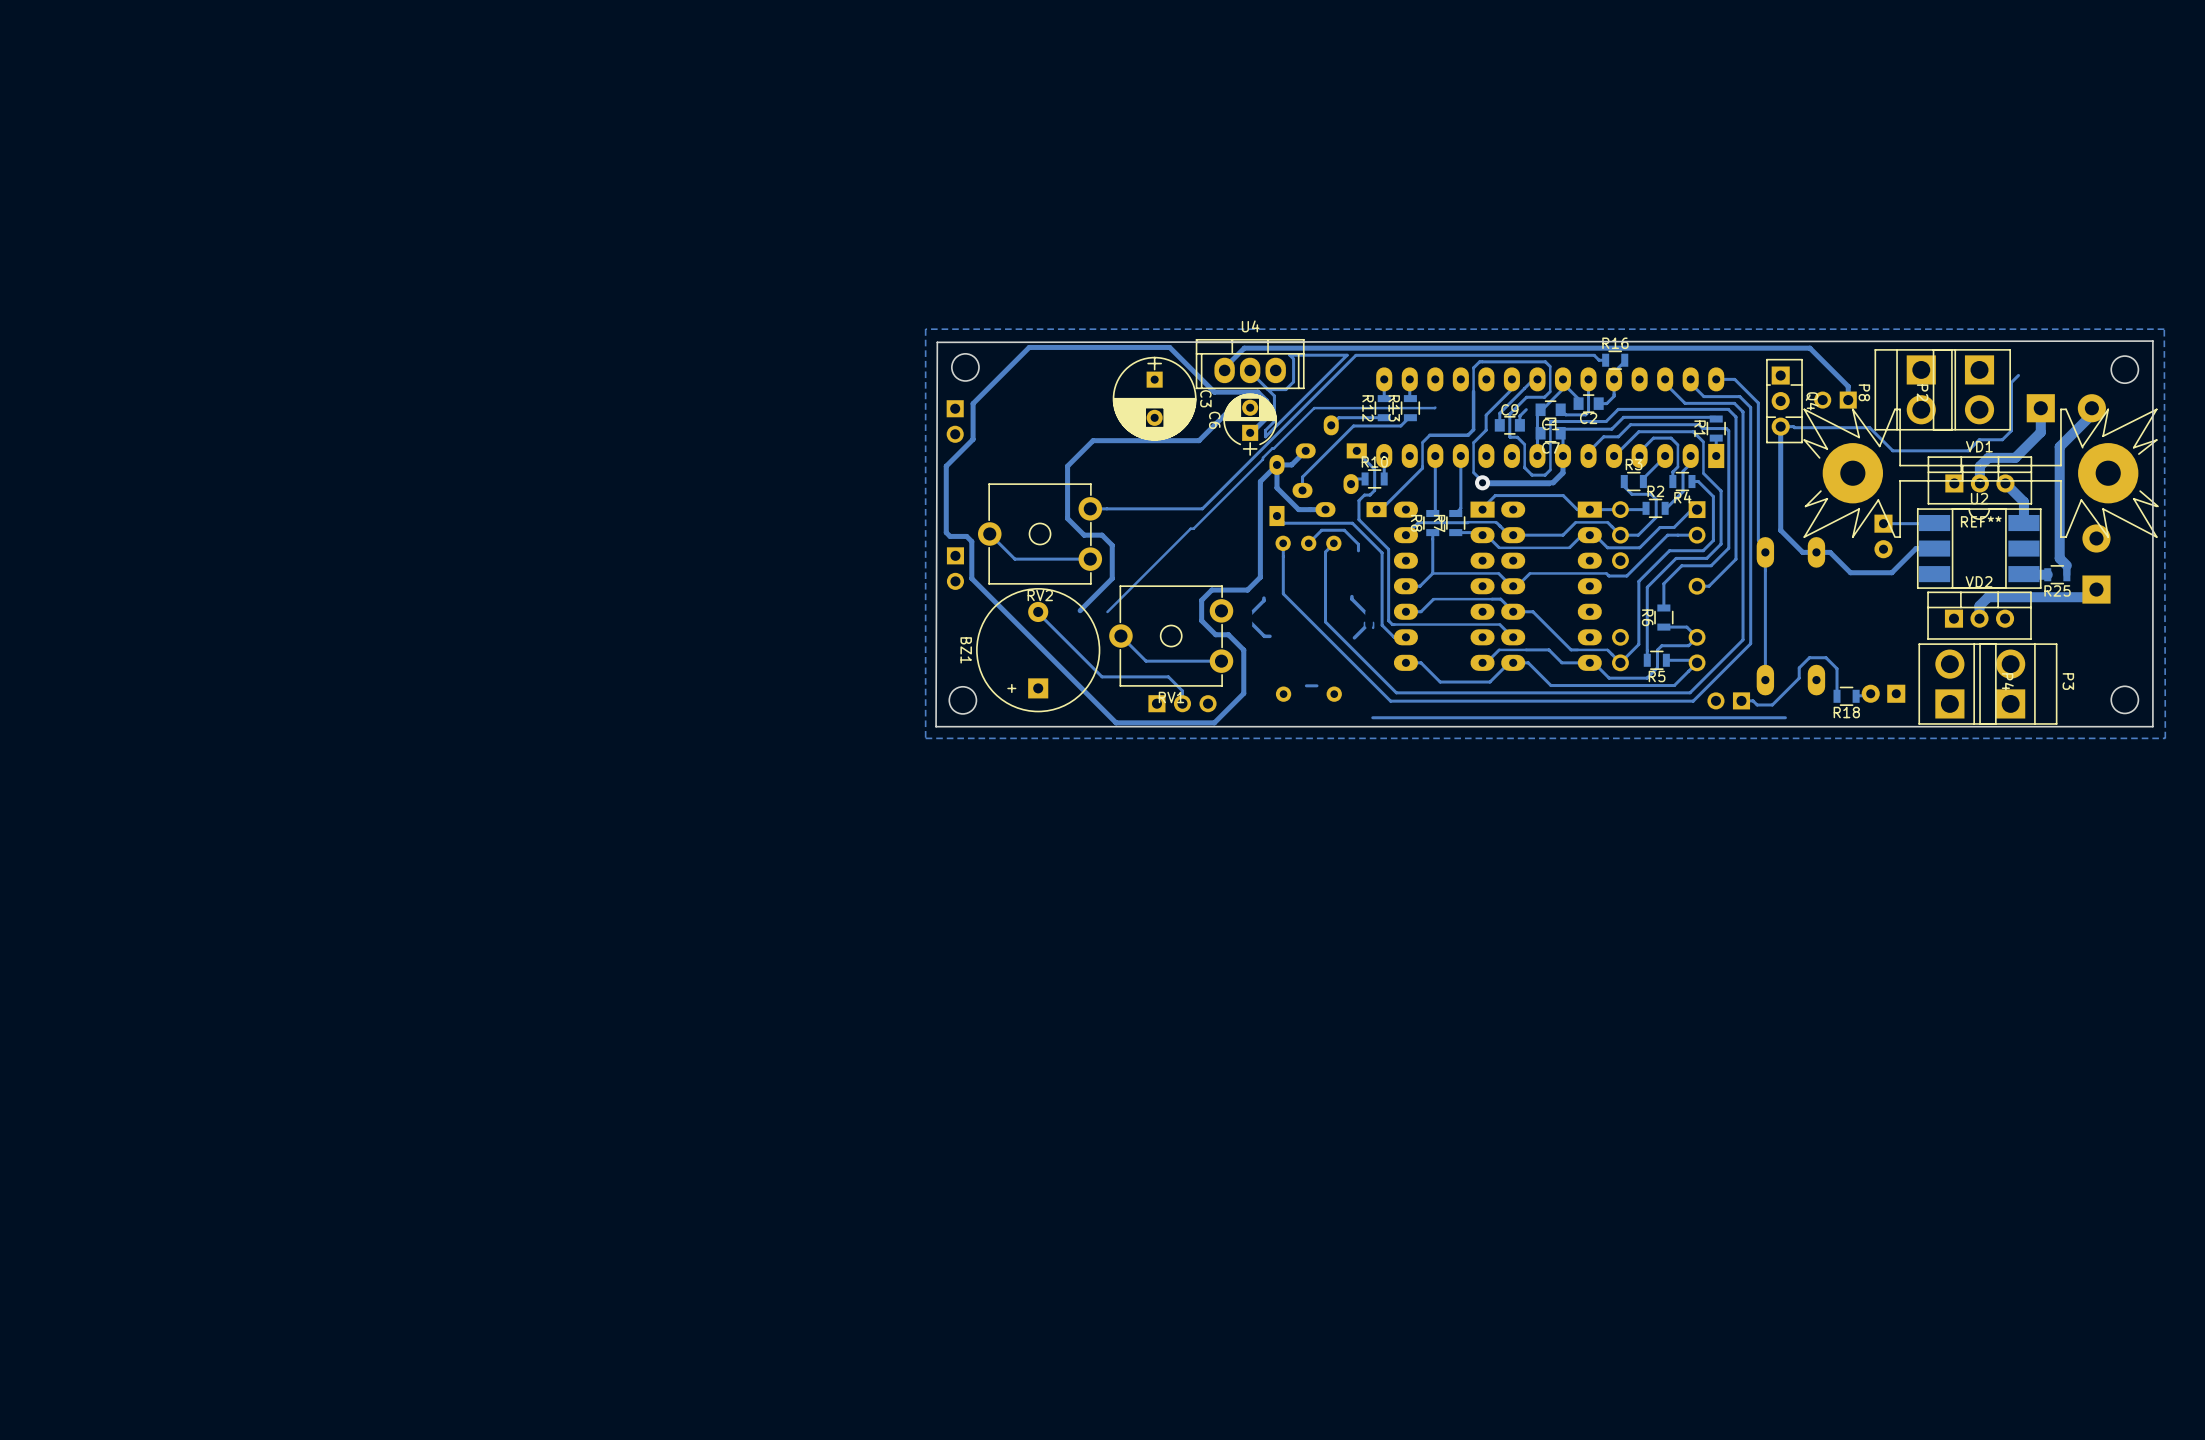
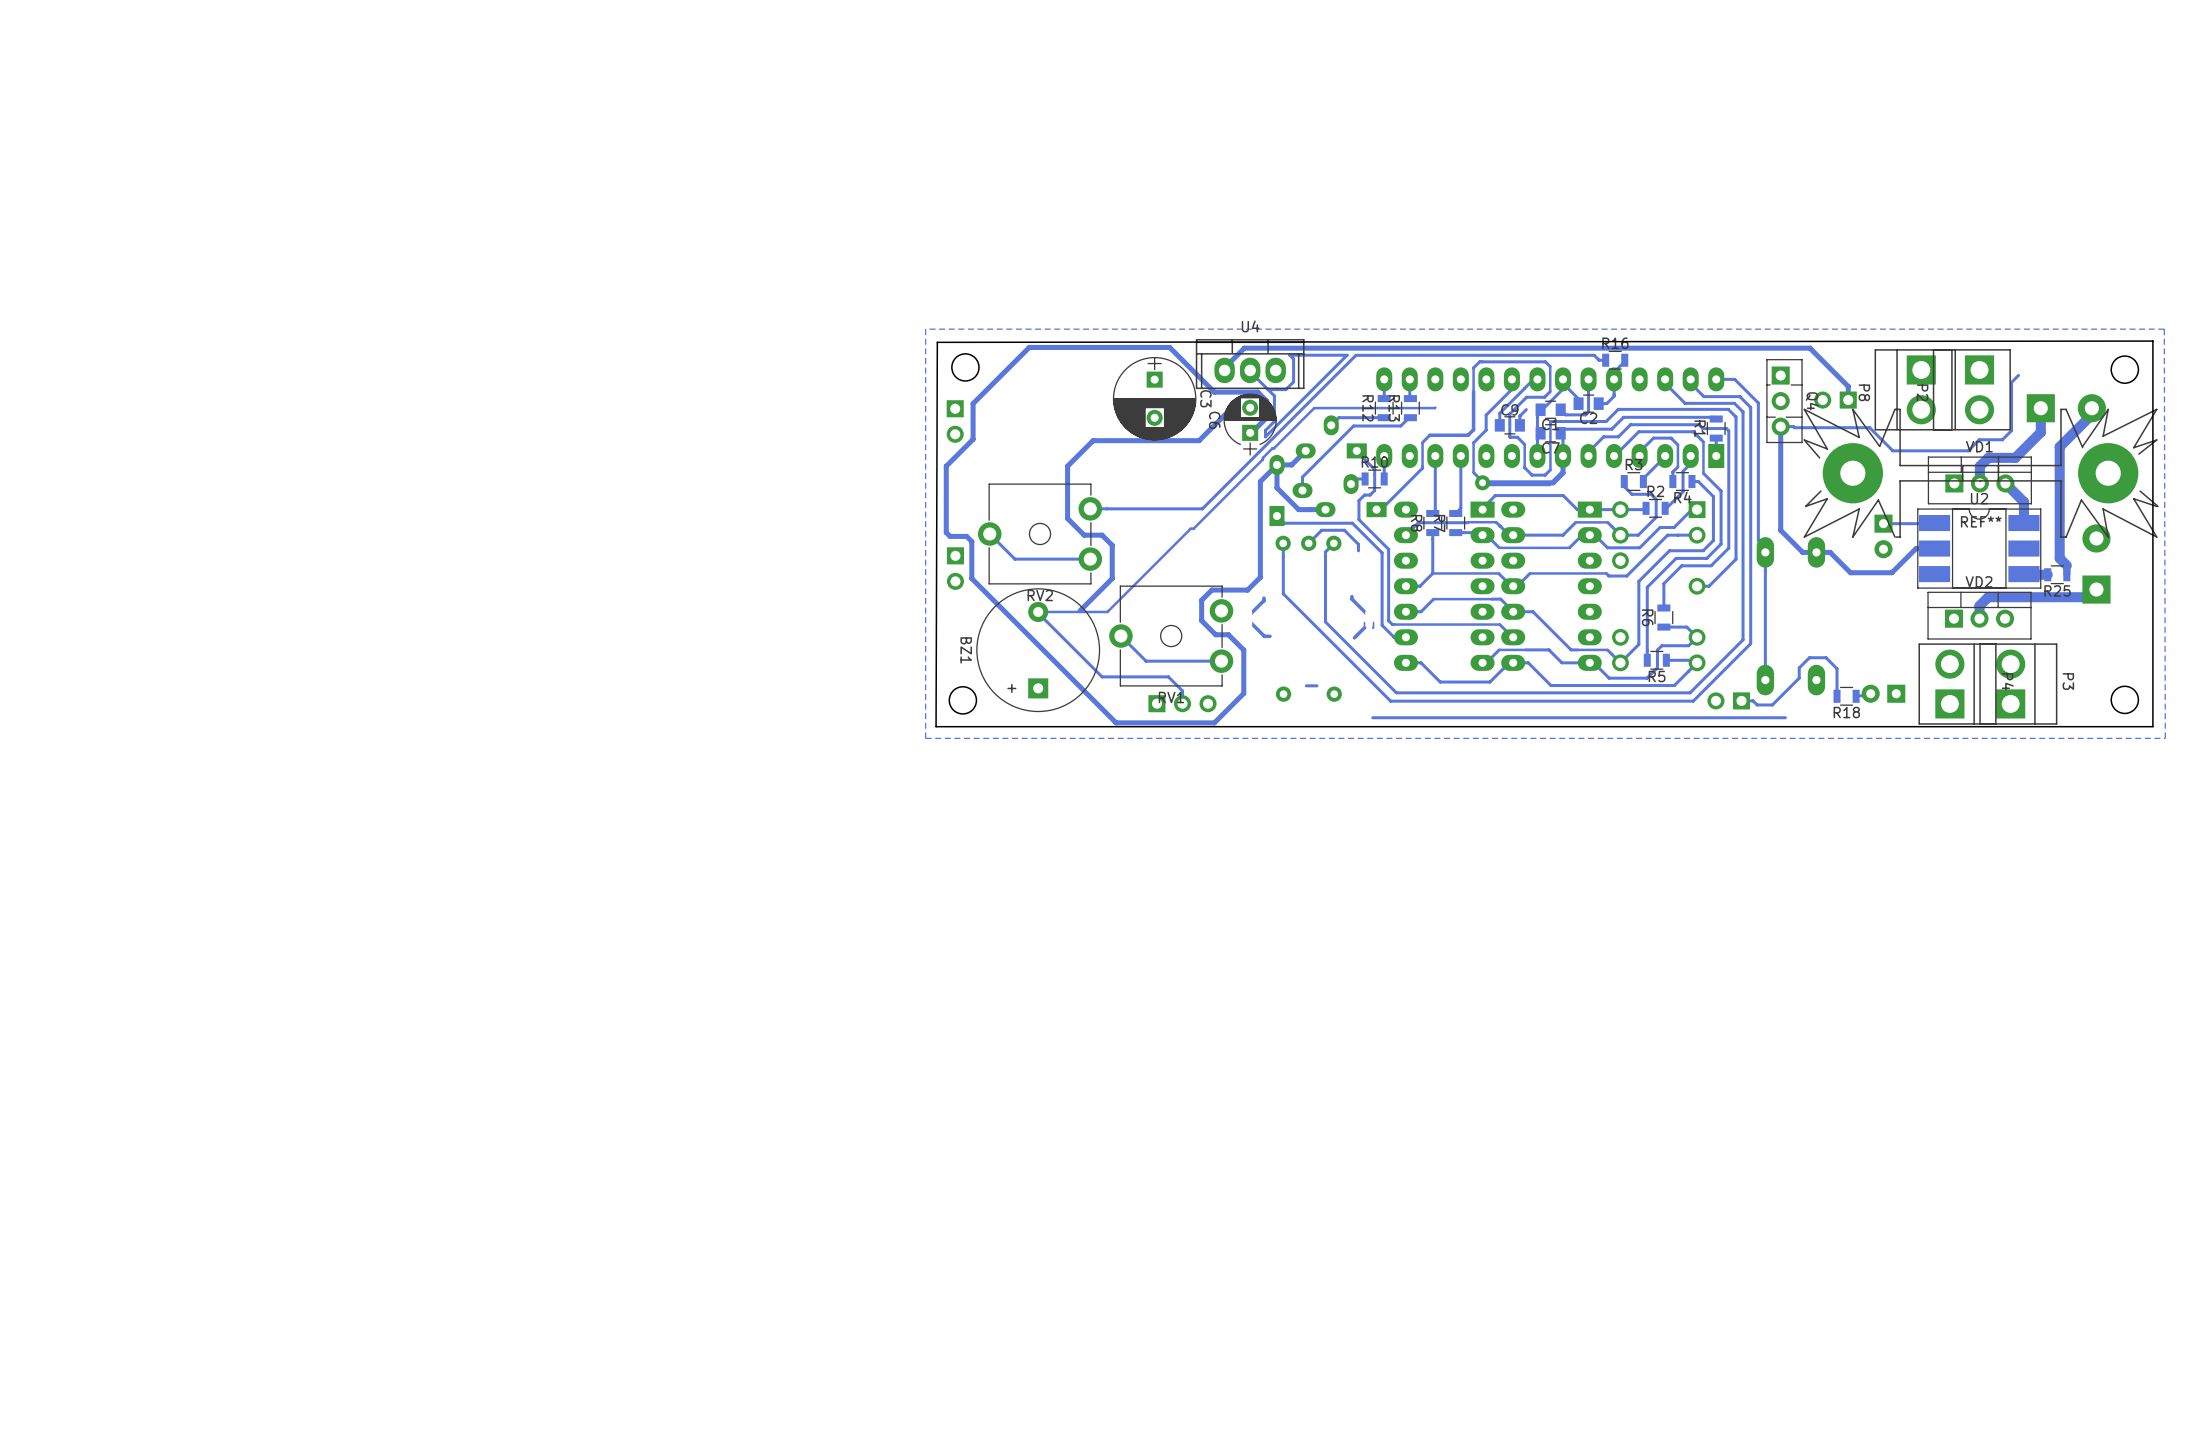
track: none -> (1107, 611) (1038, 611)

